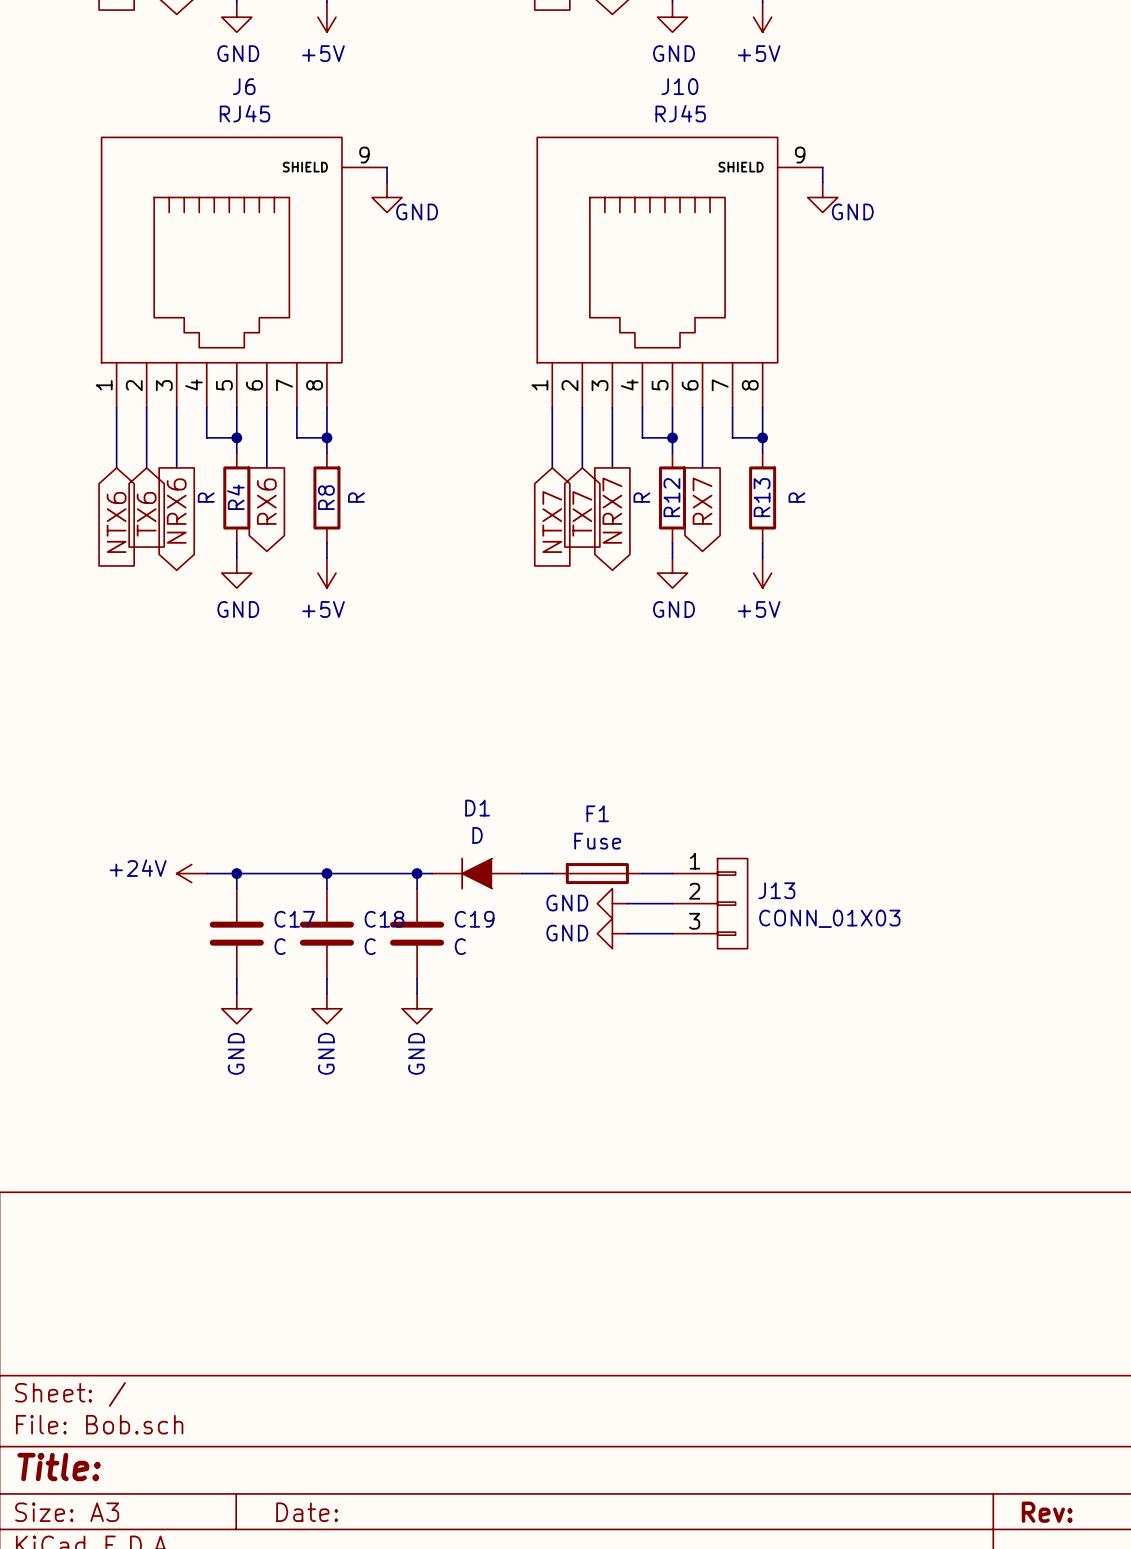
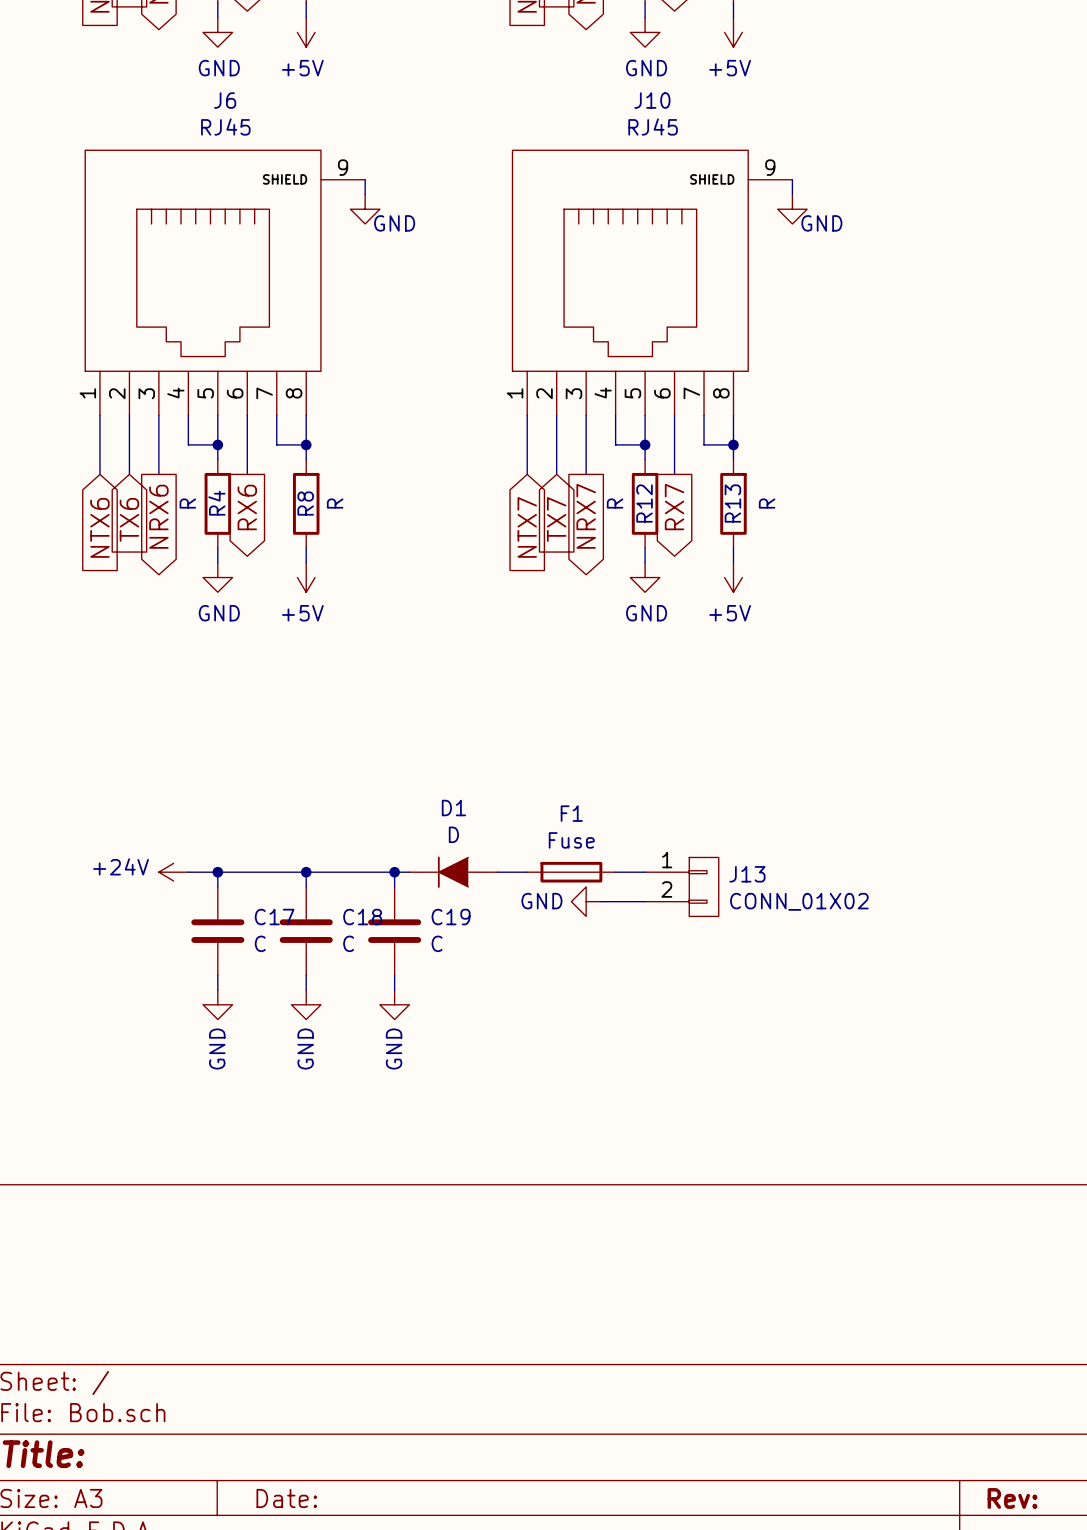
J13 symbol: [672, 858, 748, 949] -> [645, 857, 719, 917]
J13 value: CONN_01X03 (829, 918) -> CONN_01X02 (799, 901)
power symbol: GND (612, 933) -> none
wire: (627, 933) (672, 933) -> none

